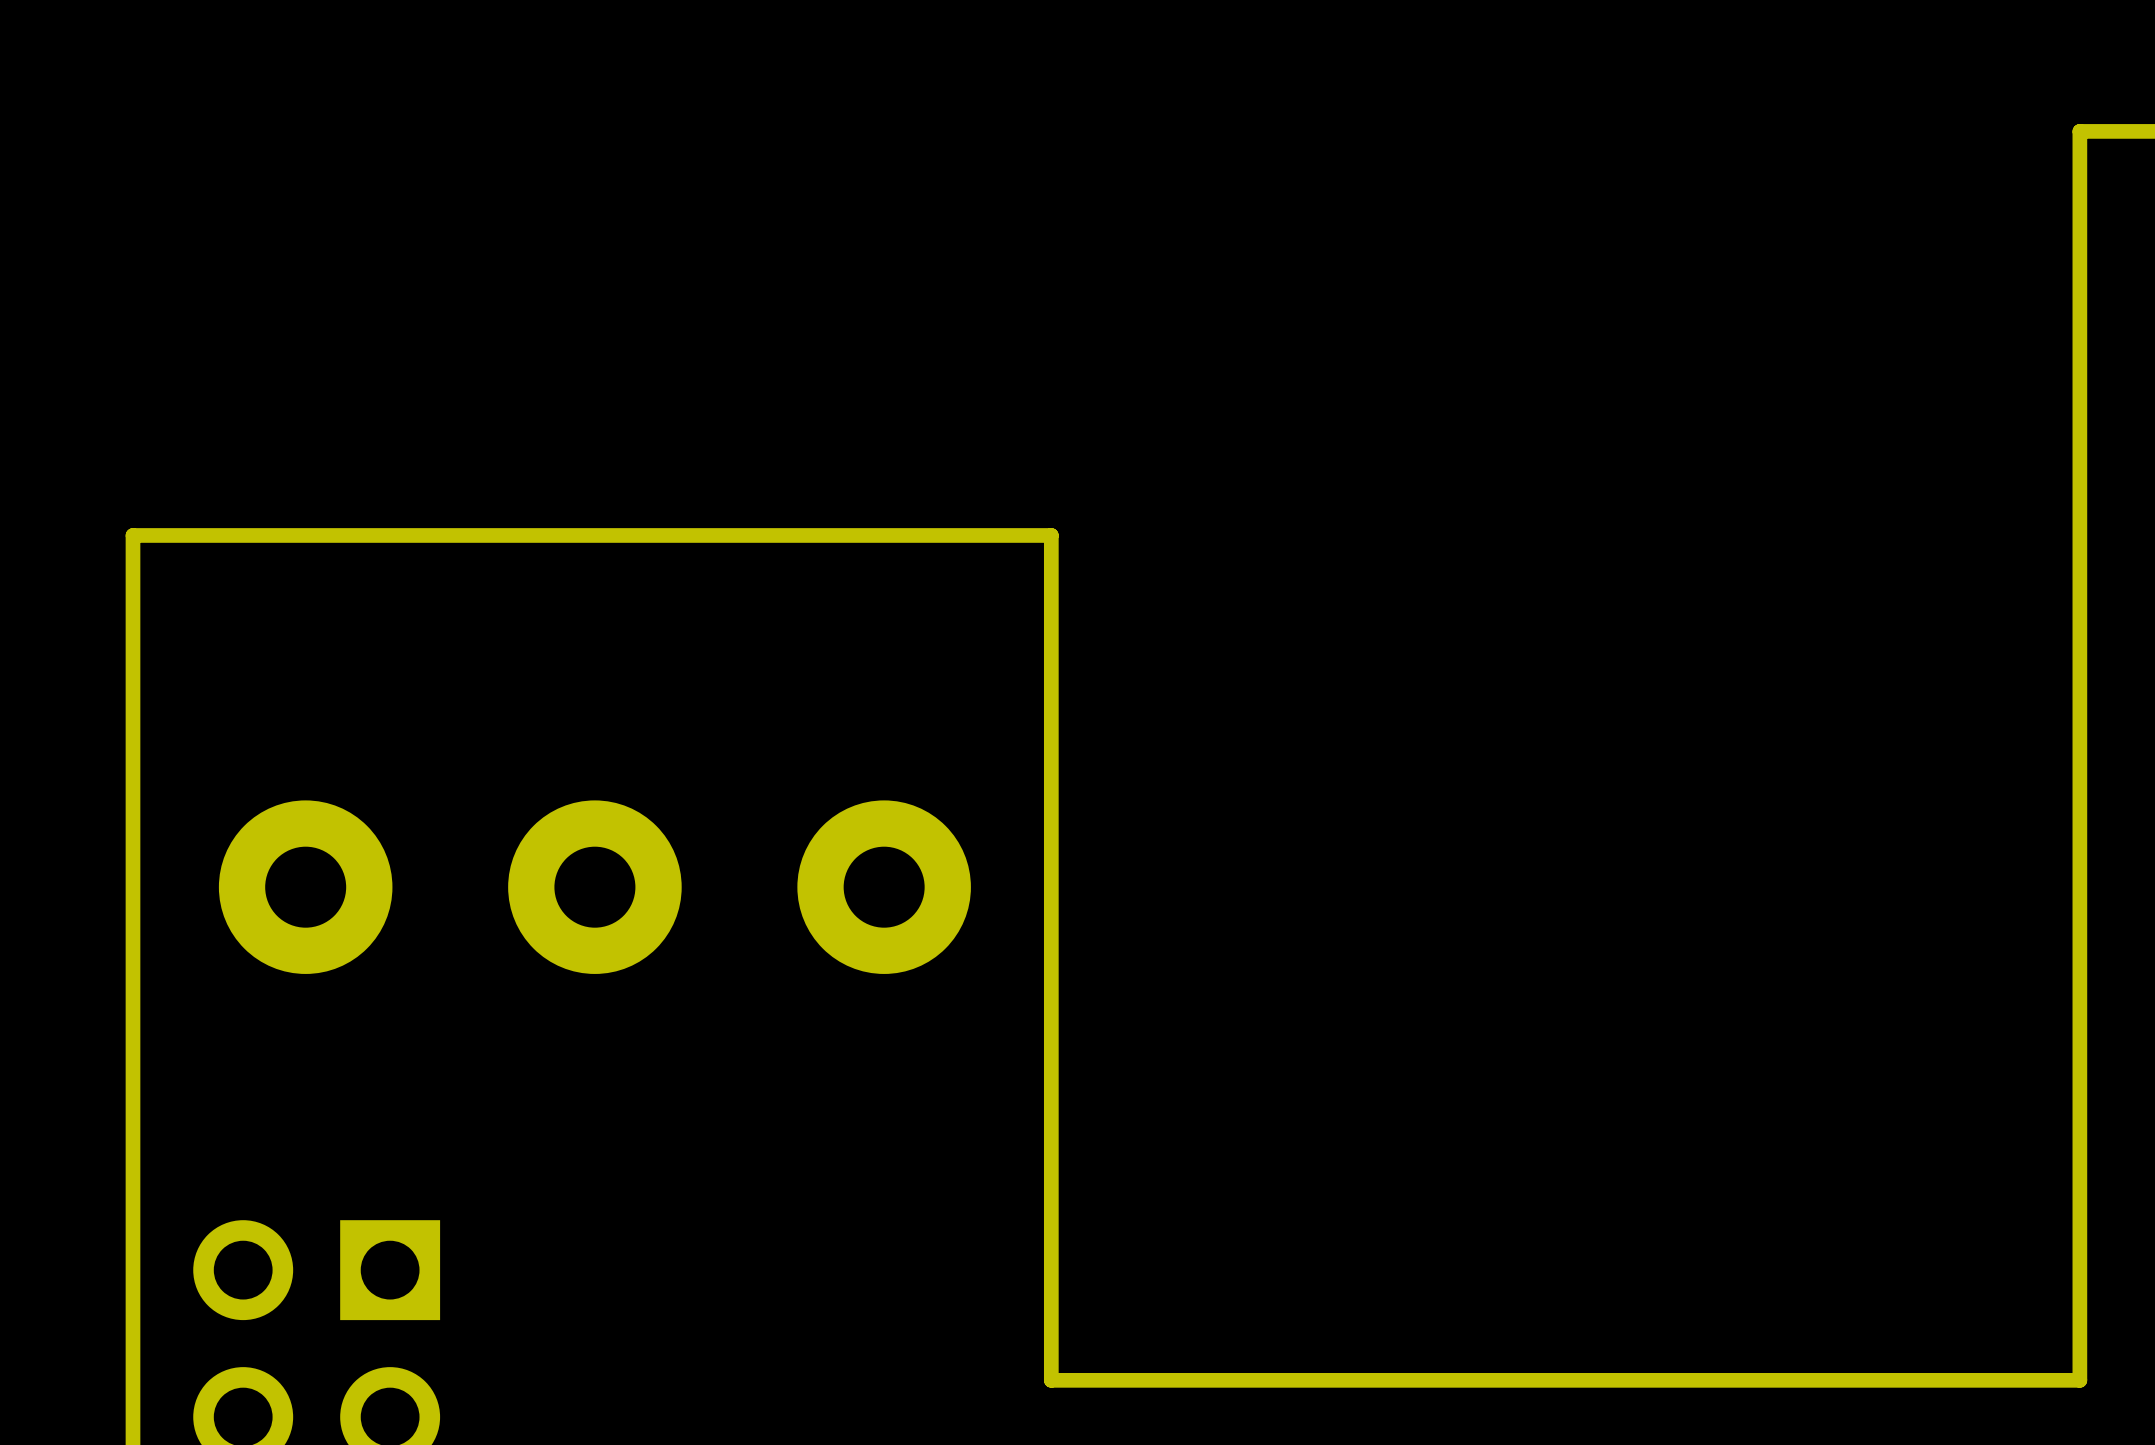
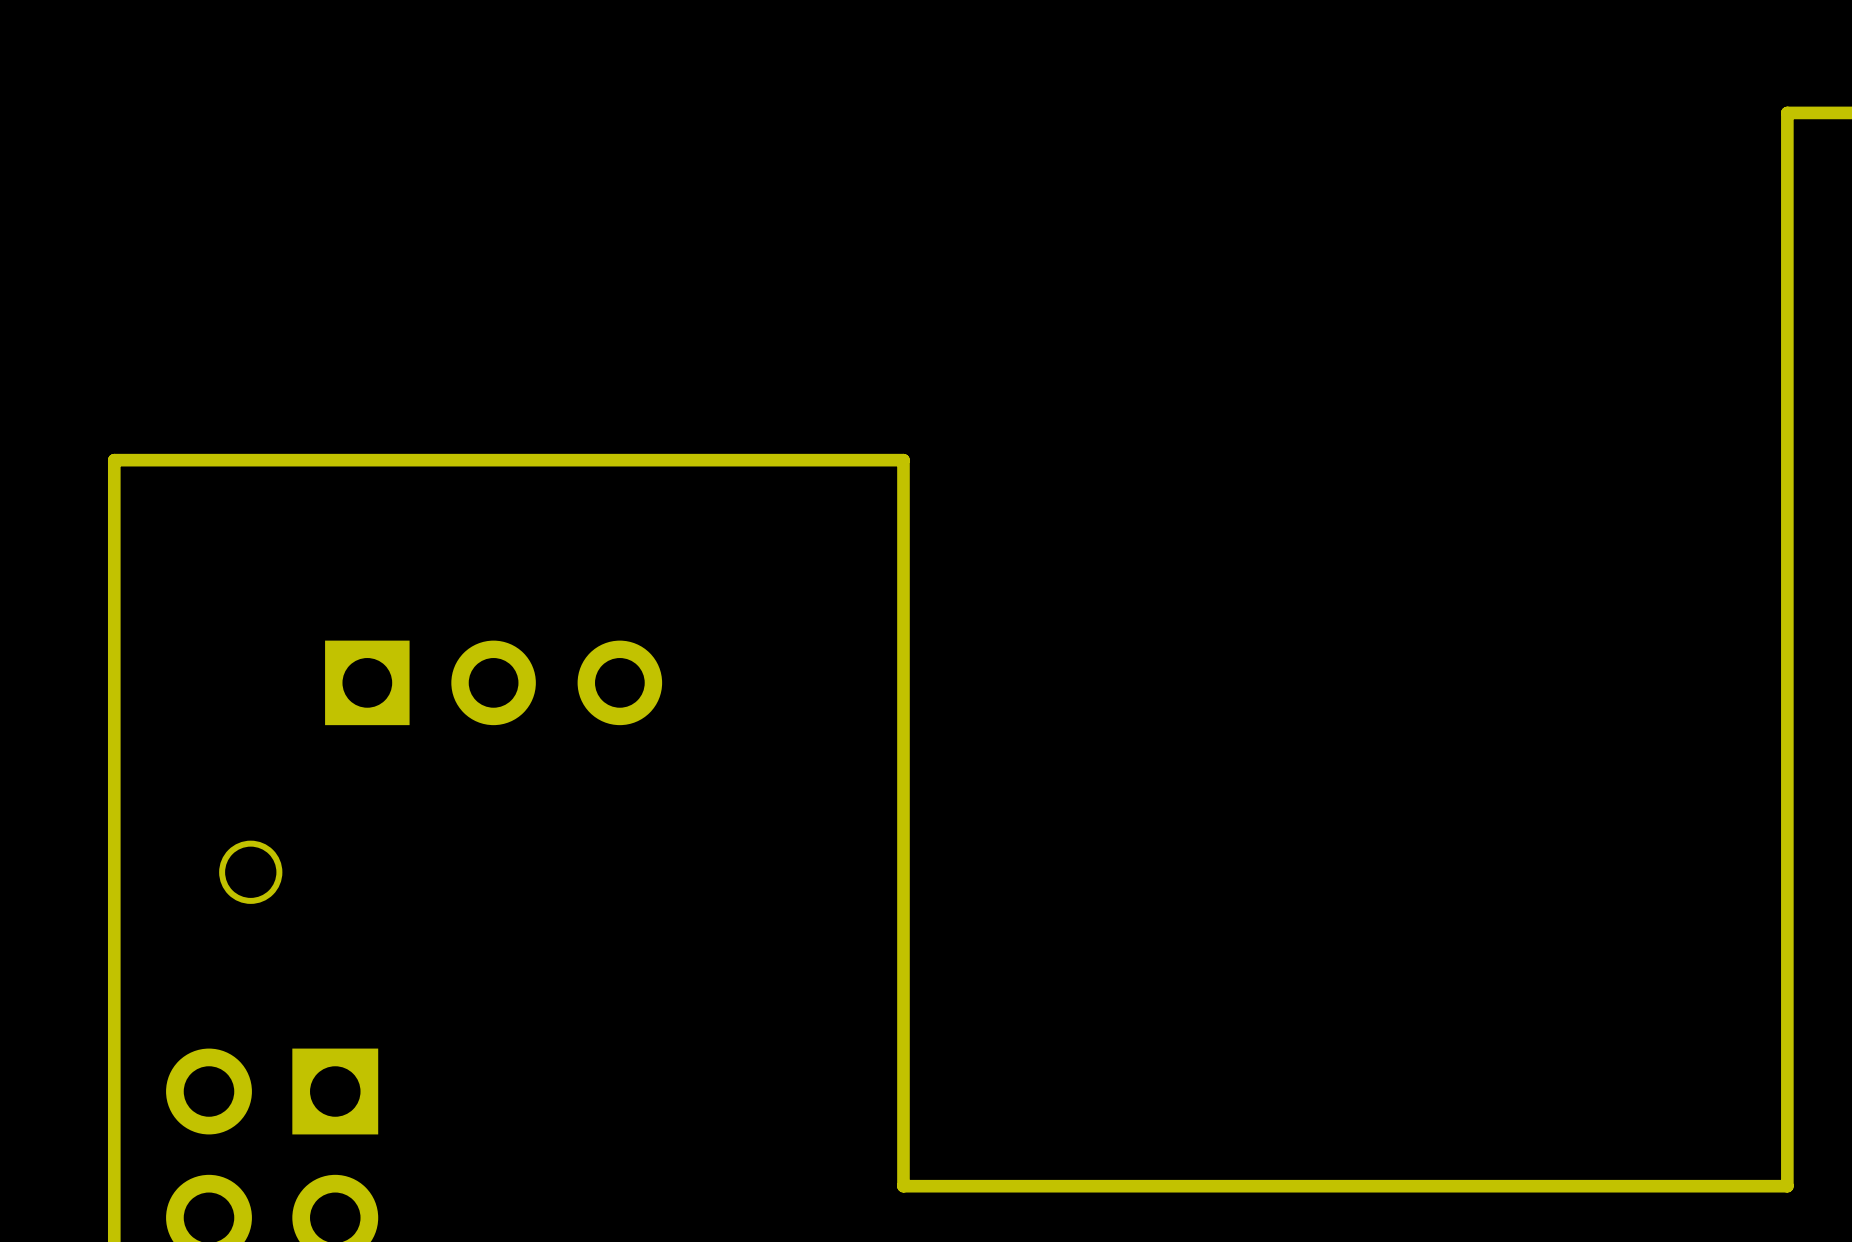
part: none -> (493, 682)
part: (594, 887) -> none
round board edge: none -> [219, 840, 283, 904]

